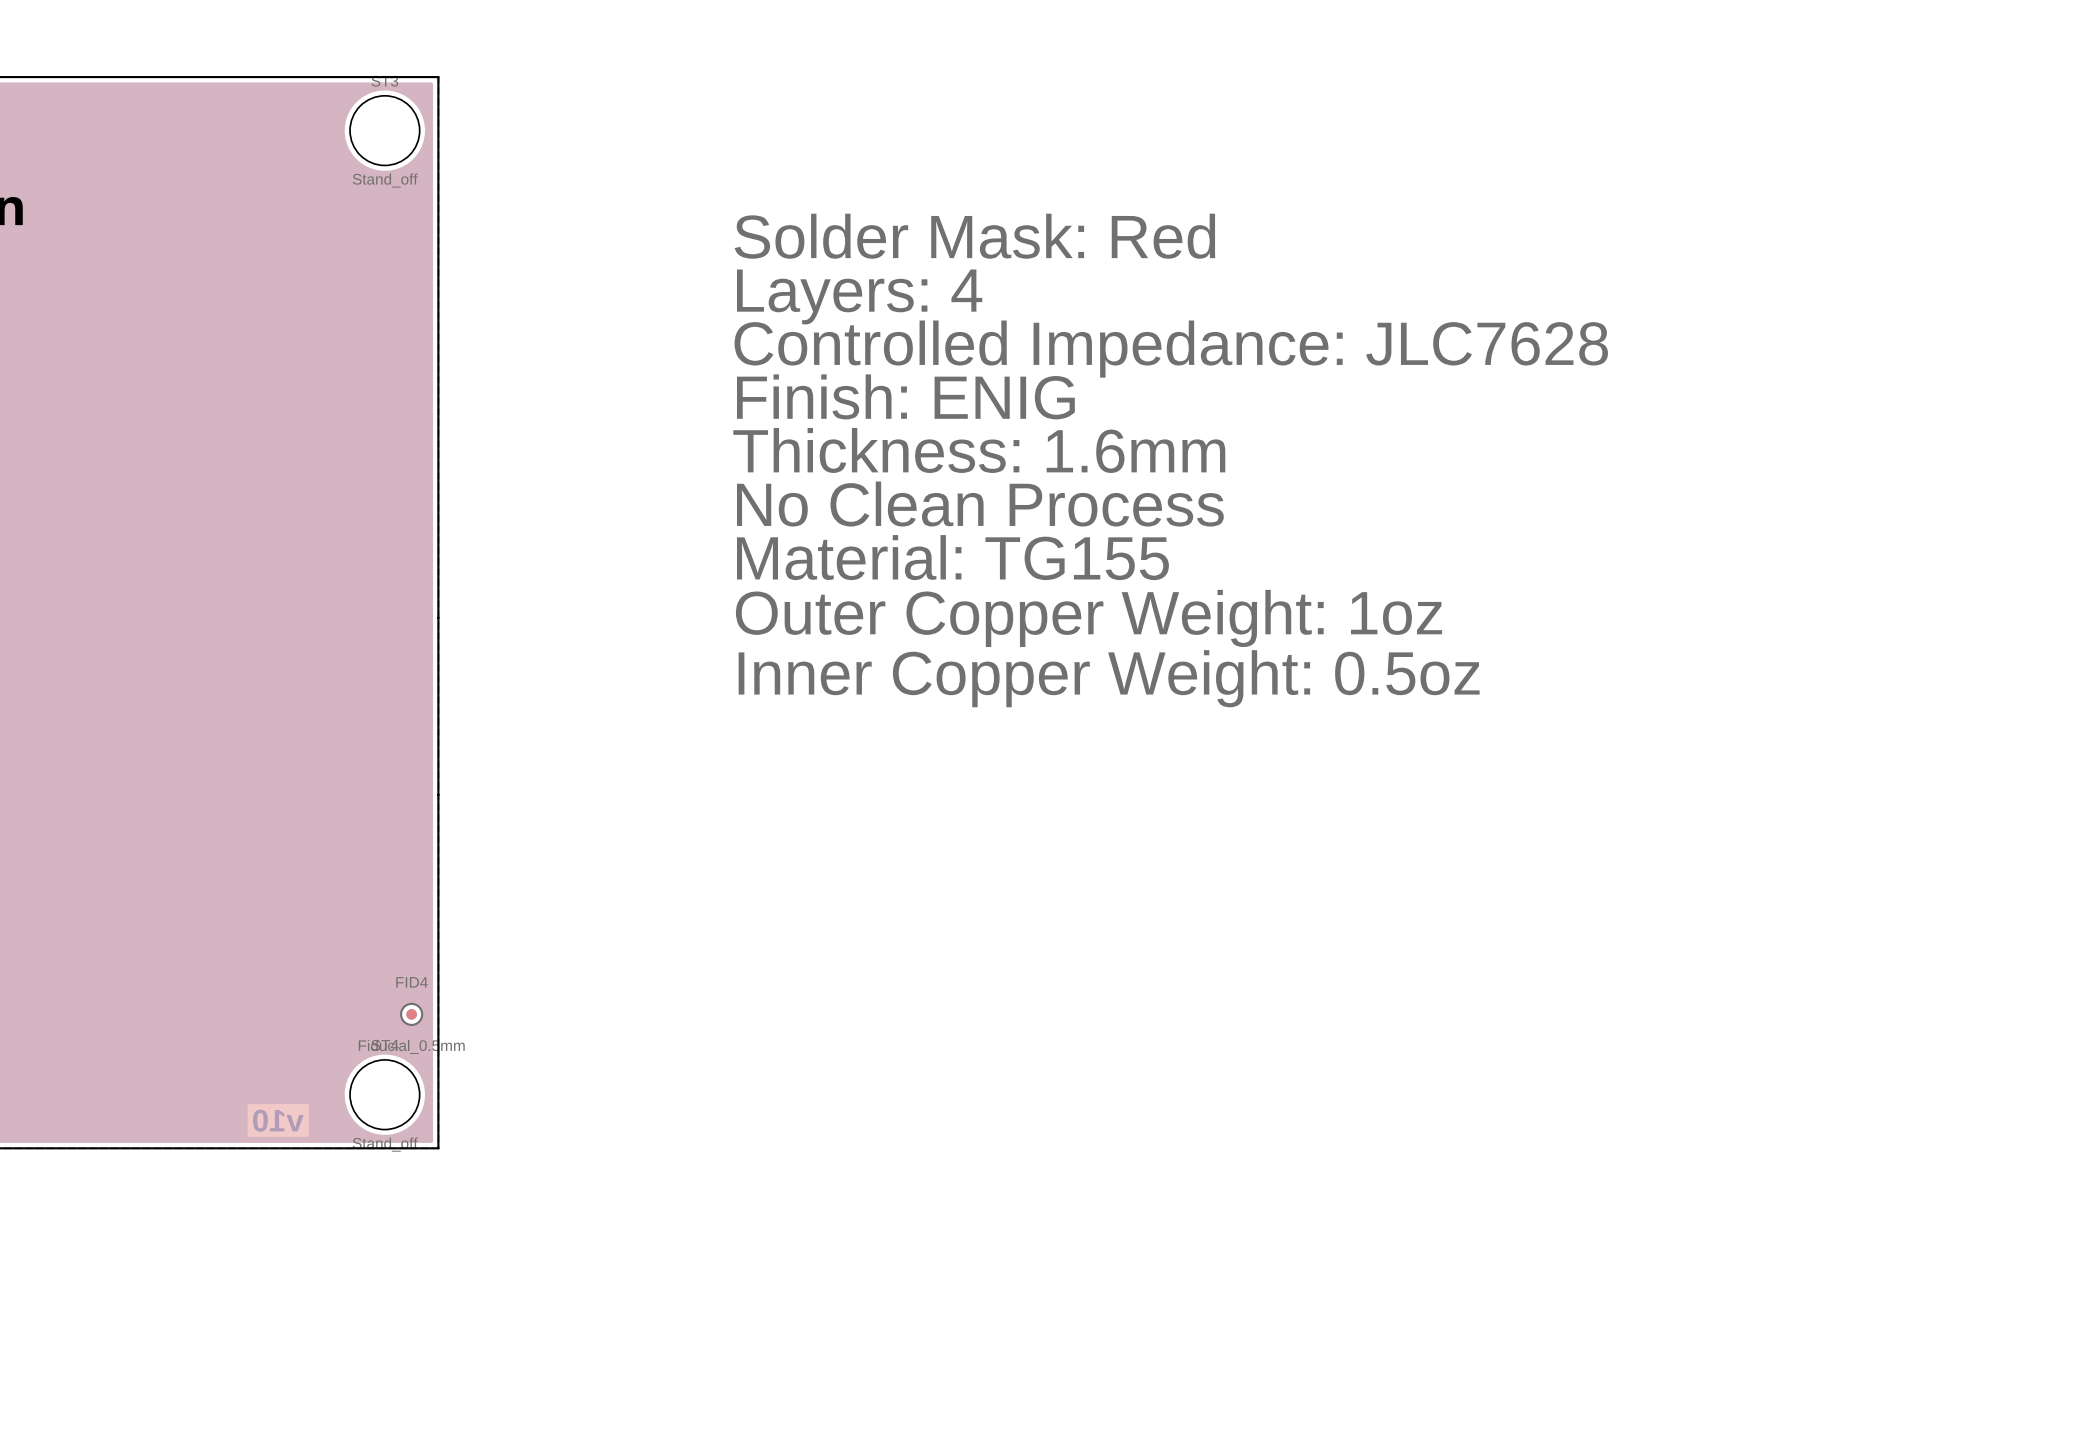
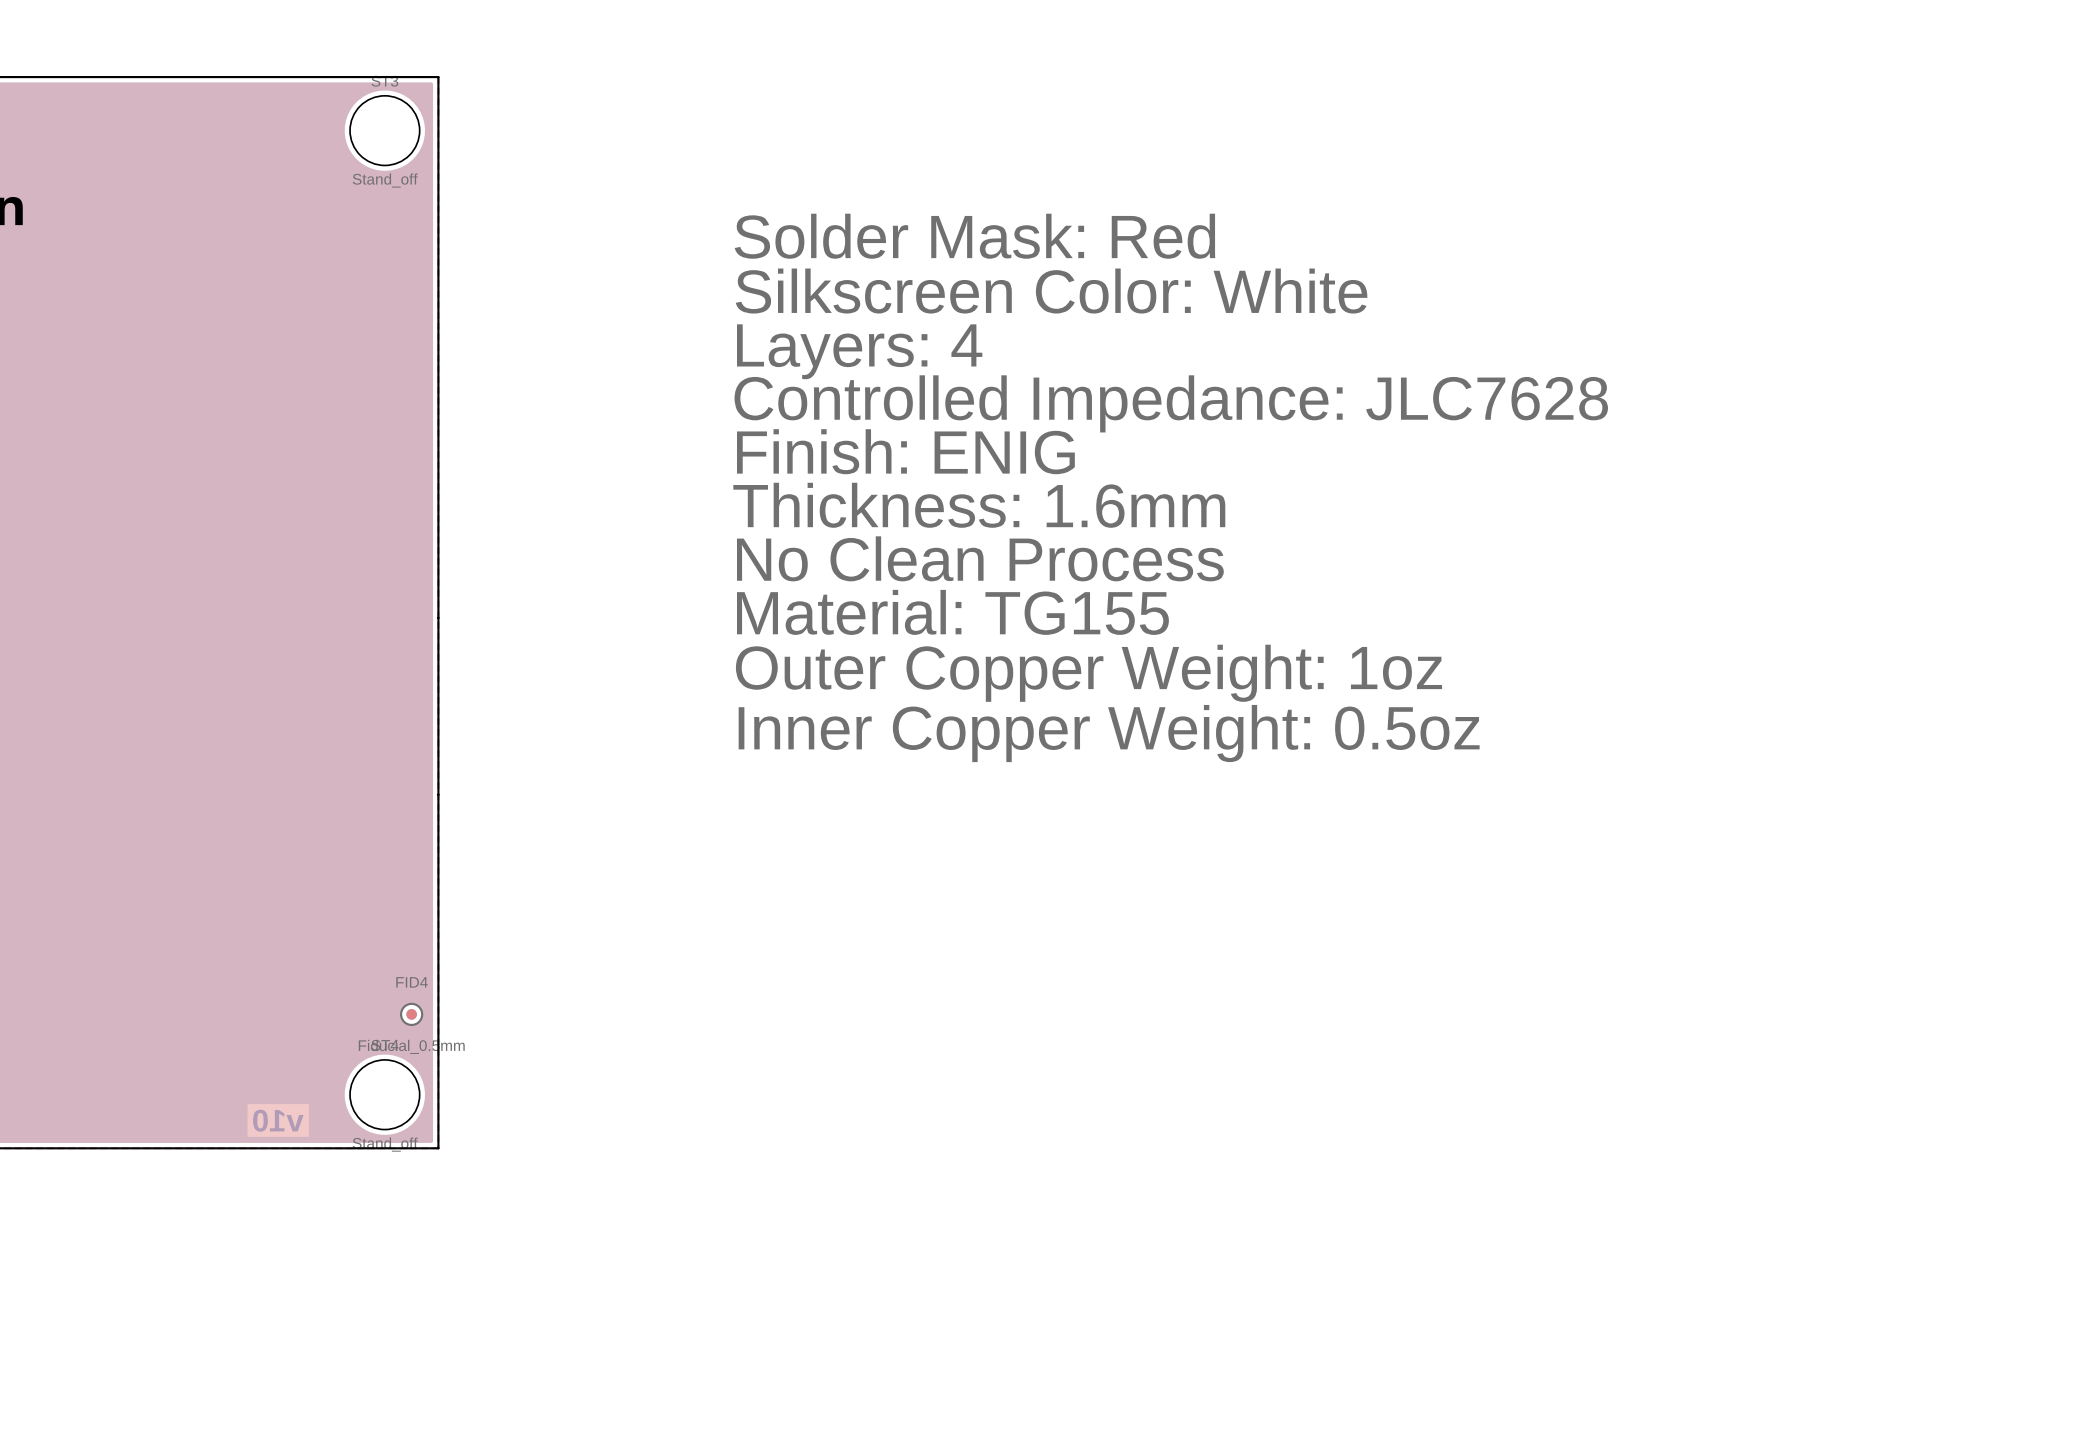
text: Layers: 4 (859, 296) -> Silkscreen Color: White (1051, 291)
text: Controlled Impedance: JLC7628 (1171, 349) -> Layers: 4 (859, 351)
text: Finish: ENIG (905, 396) -> Controlled Impedance: JLC7628 (1171, 403)
text: Thickness: 1.6mm (979, 450) -> Finish: ENIG (905, 451)
text: No Clean Process (980, 504) -> Thickness: 1.6mm (979, 505)
text: Material: TG155 (952, 557) -> No Clean Process (980, 558)
text: Outer Copper Weight: 1oz (1088, 618) -> Material: TG155 (952, 612)
text: Inner Copper Weight: 0.5oz (1109, 678) -> Outer Copper Weight: 1oz (1088, 673)
text: none -> Inner Copper Weight: 0.5oz (1109, 733)

